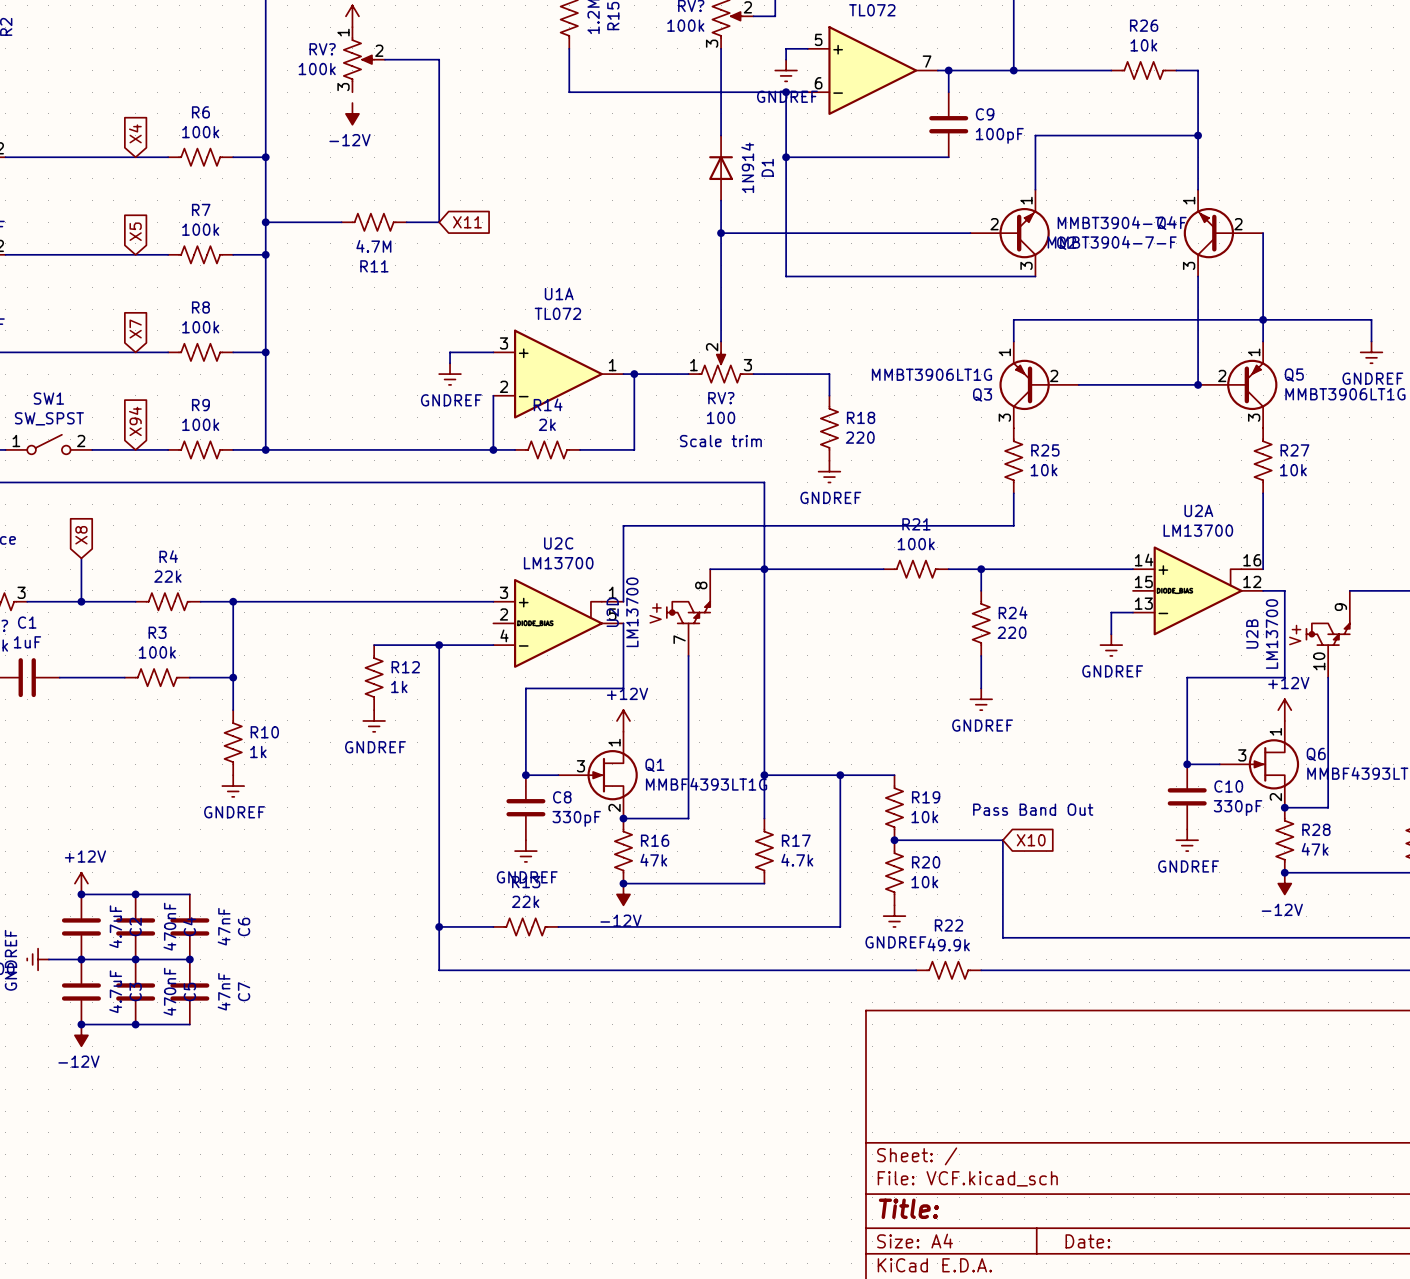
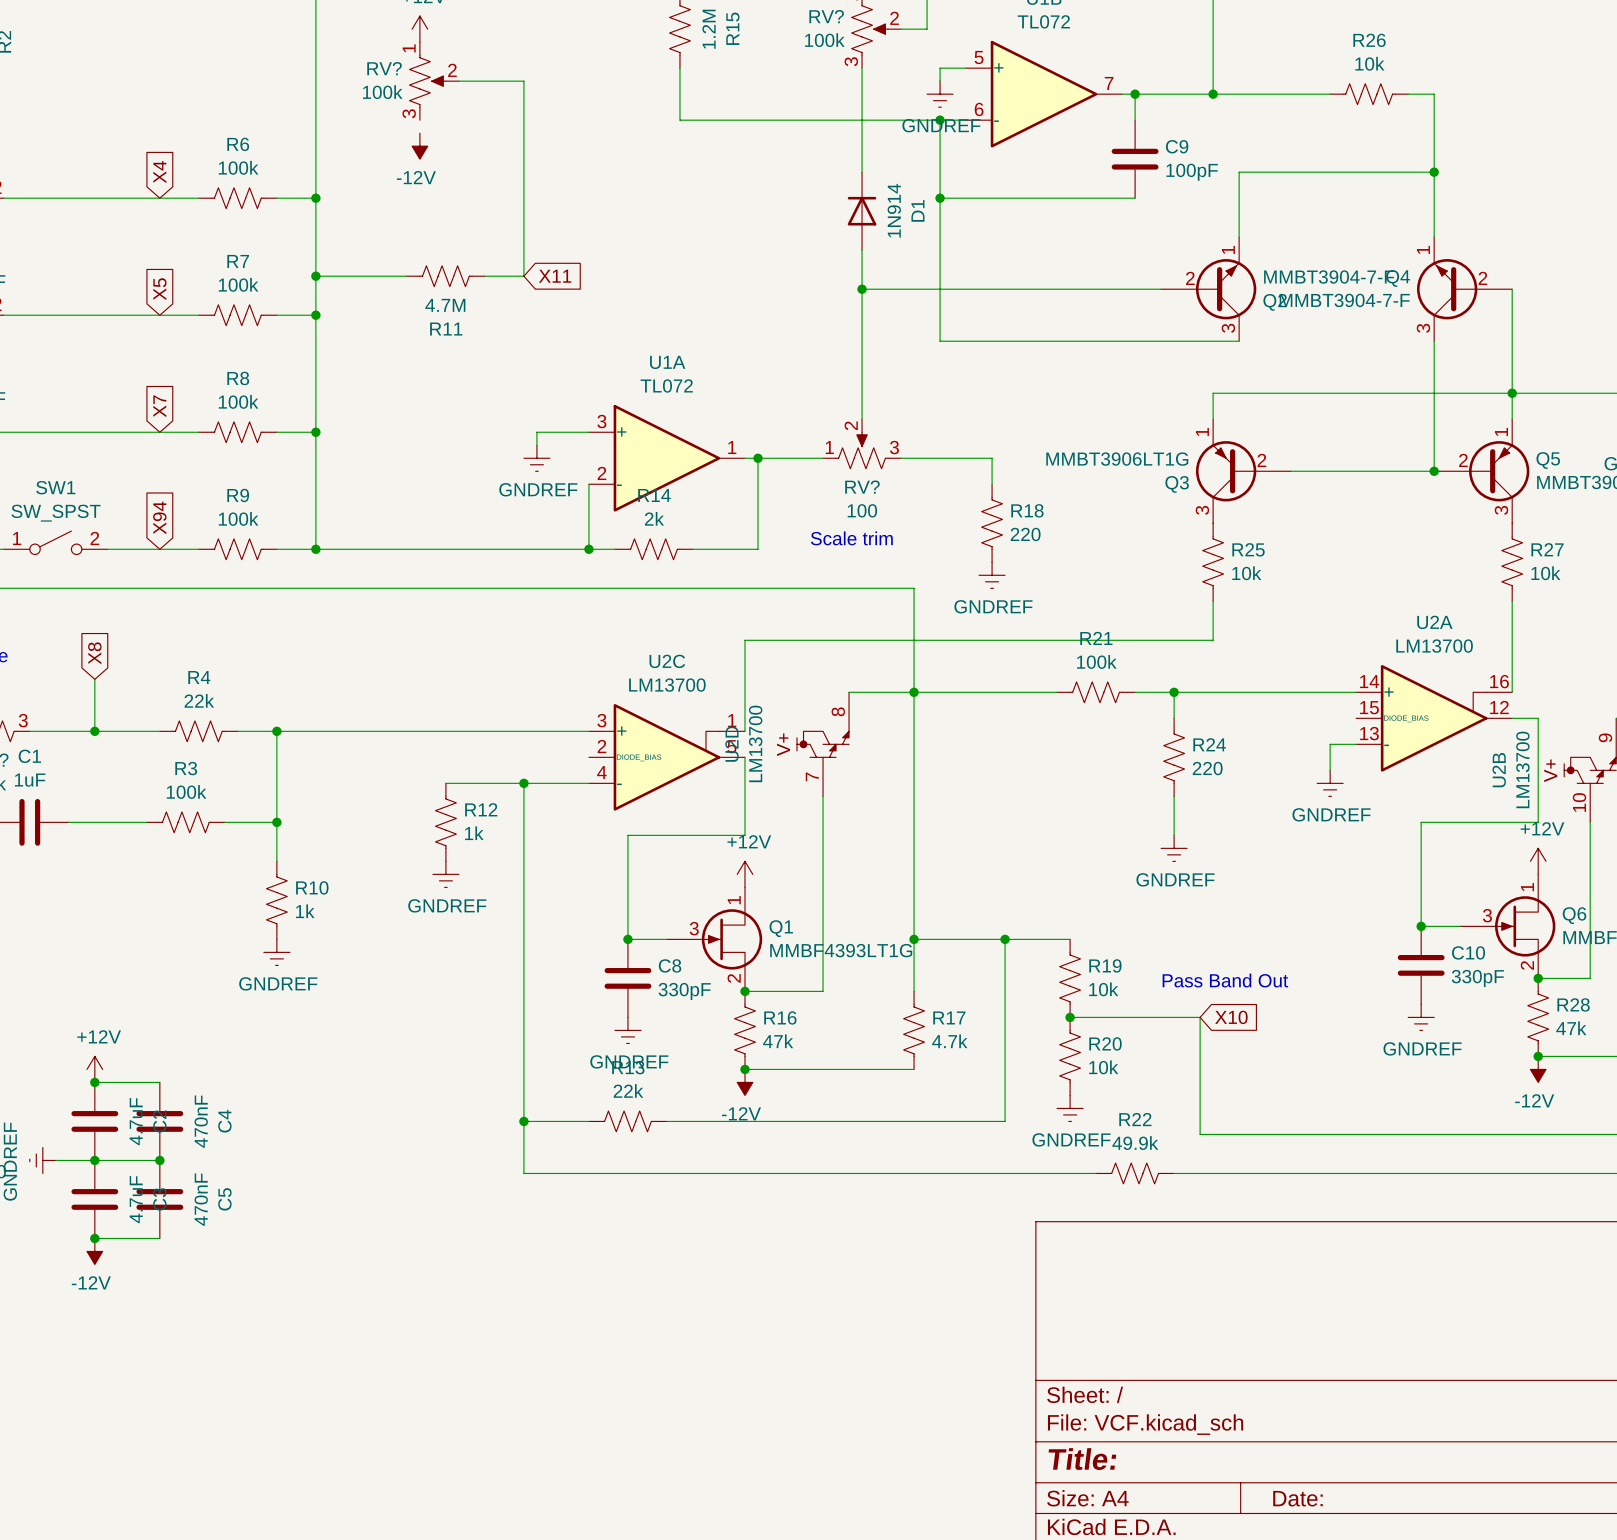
wire: (135, 894) (189, 894) -> none
junction: (135, 894) -> none
C6: 47nF (189, 926) -> none
wire: (135, 959) (189, 959) -> none
junction: (189, 959) -> none
C7: 47nF (189, 992) -> none
wire: (135, 1024) (189, 1024) -> none
junction: (135, 1024) -> none

